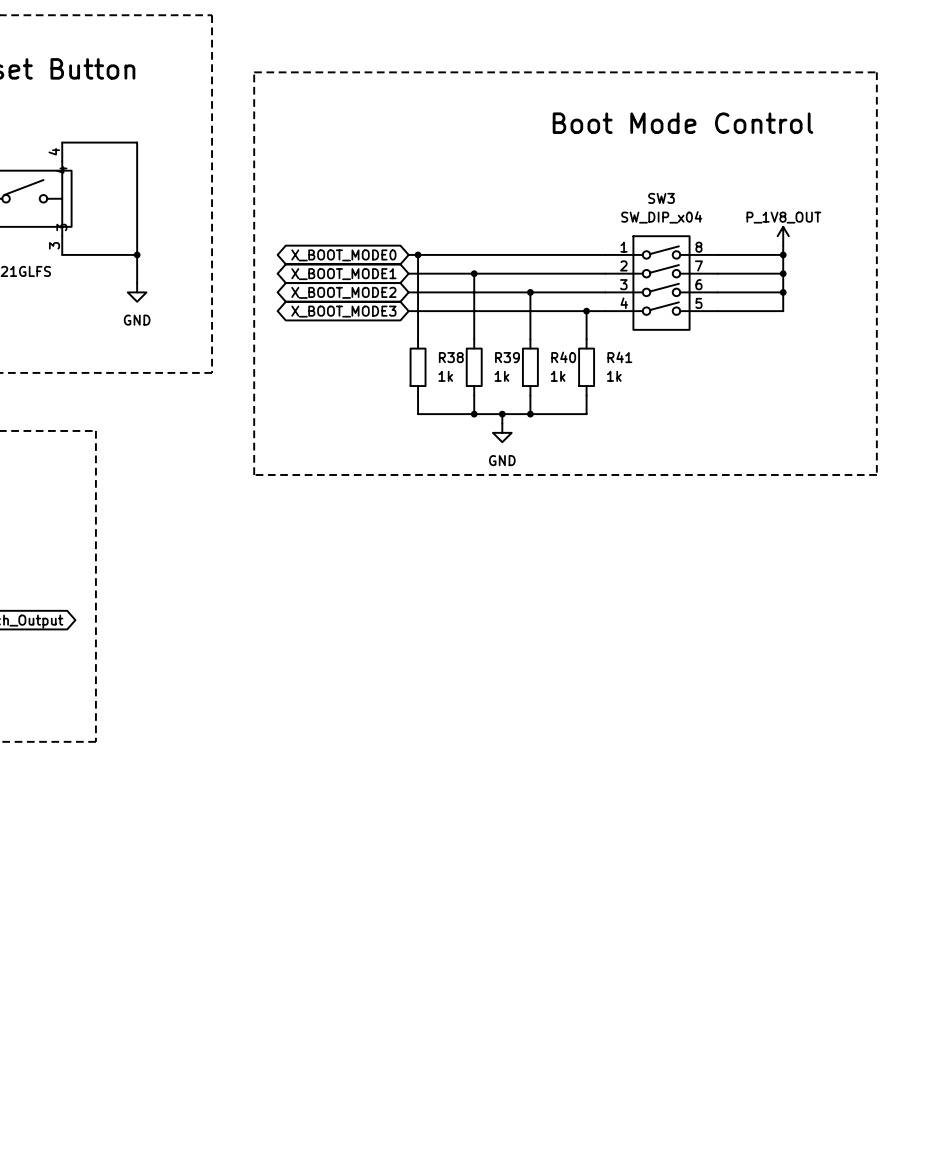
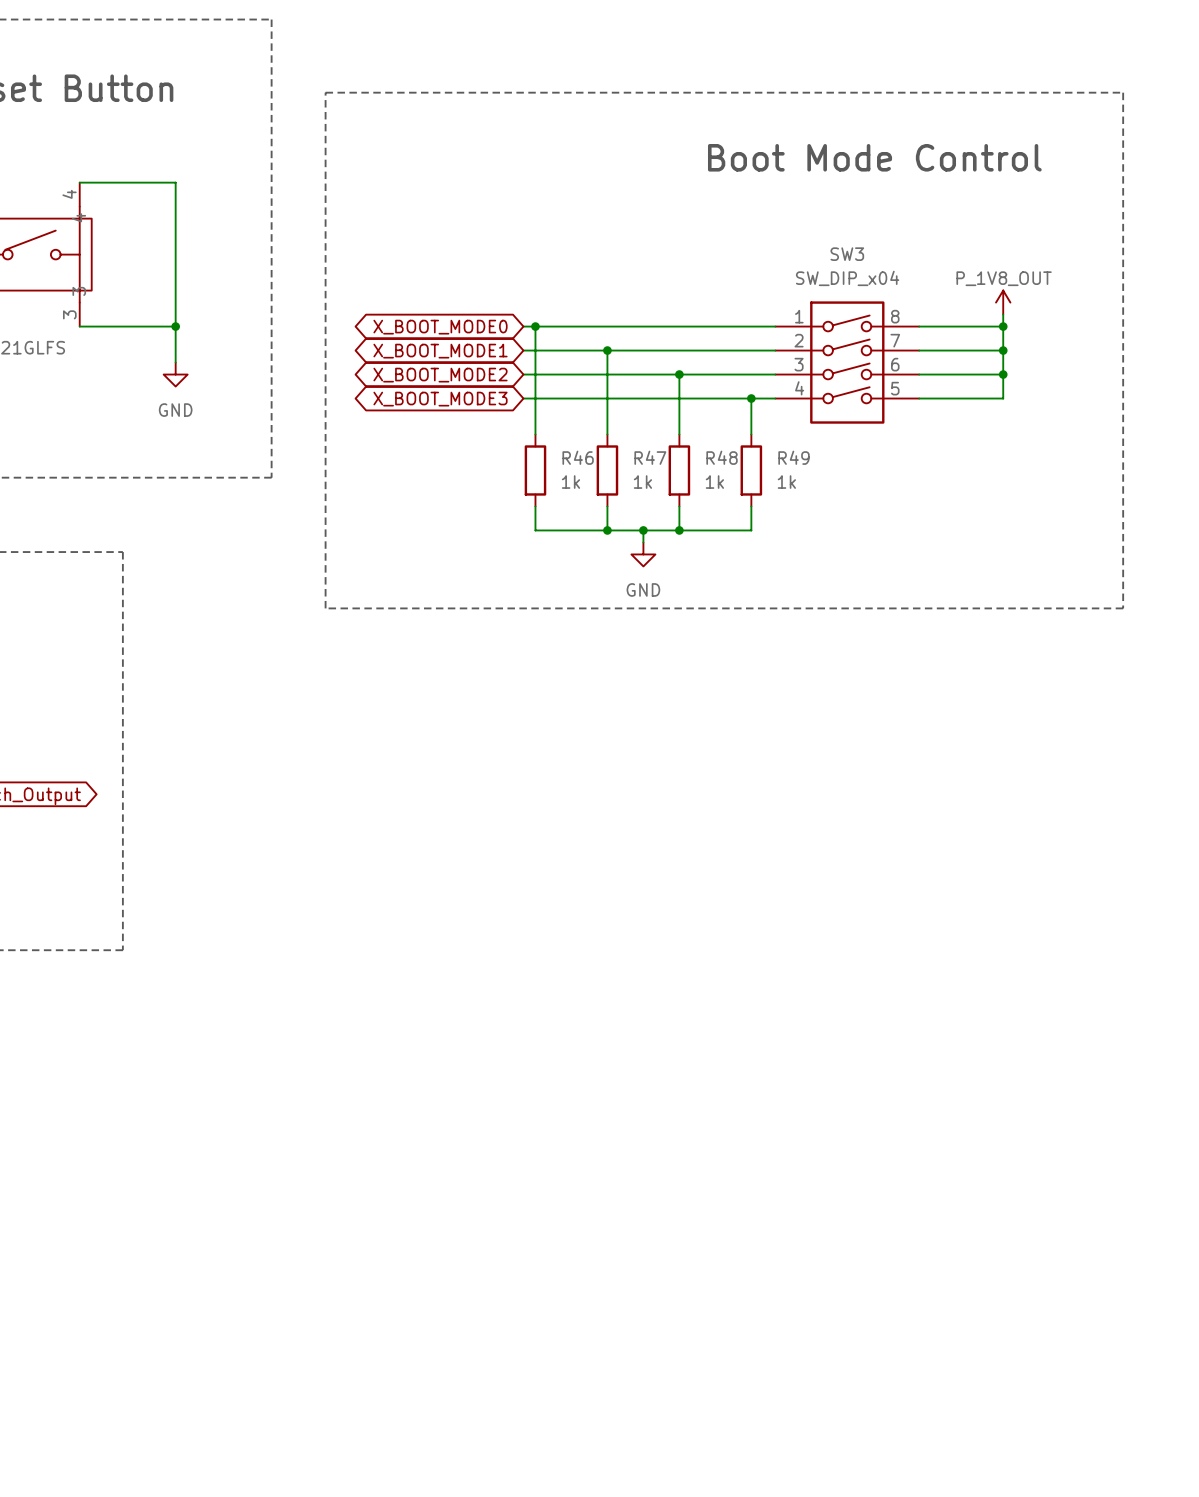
R38 name: R38 (451, 357) -> R46 (578, 457)
R39 name: R39 (507, 357) -> R47 (650, 457)
R40 name: R40 (563, 357) -> R48 (722, 457)
R41 name: R41 (619, 357) -> R49 (793, 457)

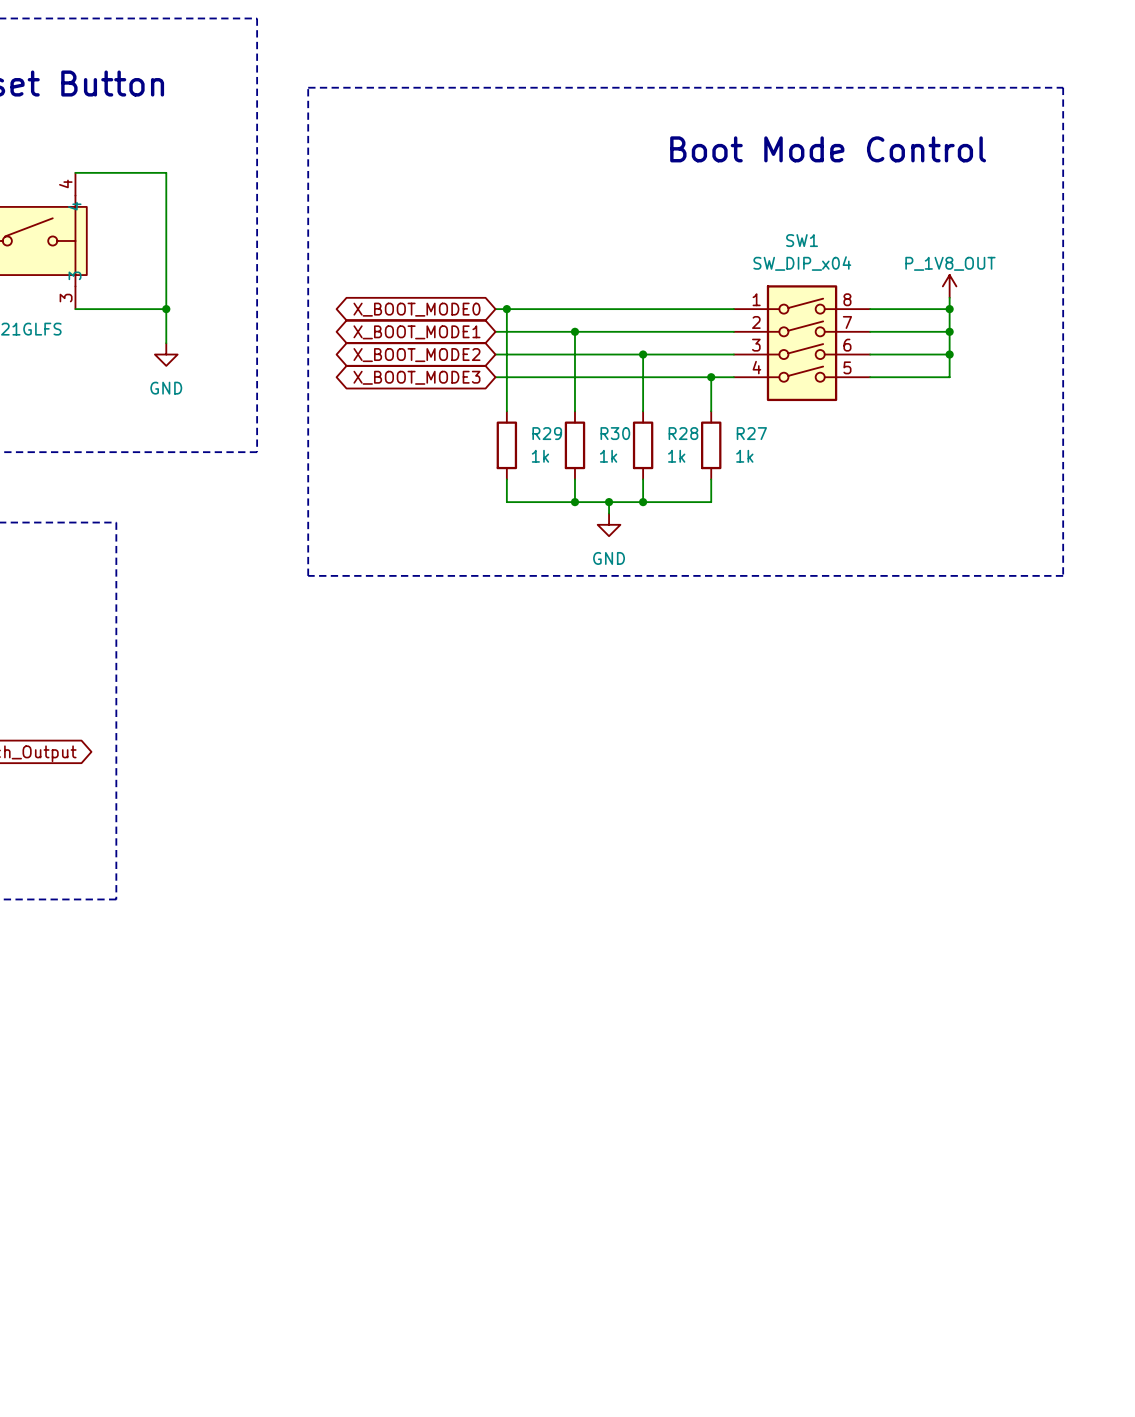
SW3 name: SW3 (847, 254) -> SW1 (802, 240)
R46 name: R46 (578, 457) -> R29 (547, 433)
R47 name: R47 (650, 457) -> R30 (615, 433)
R48 name: R48 (722, 457) -> R28 (683, 433)
R49 name: R49 (793, 457) -> R27 (751, 433)

